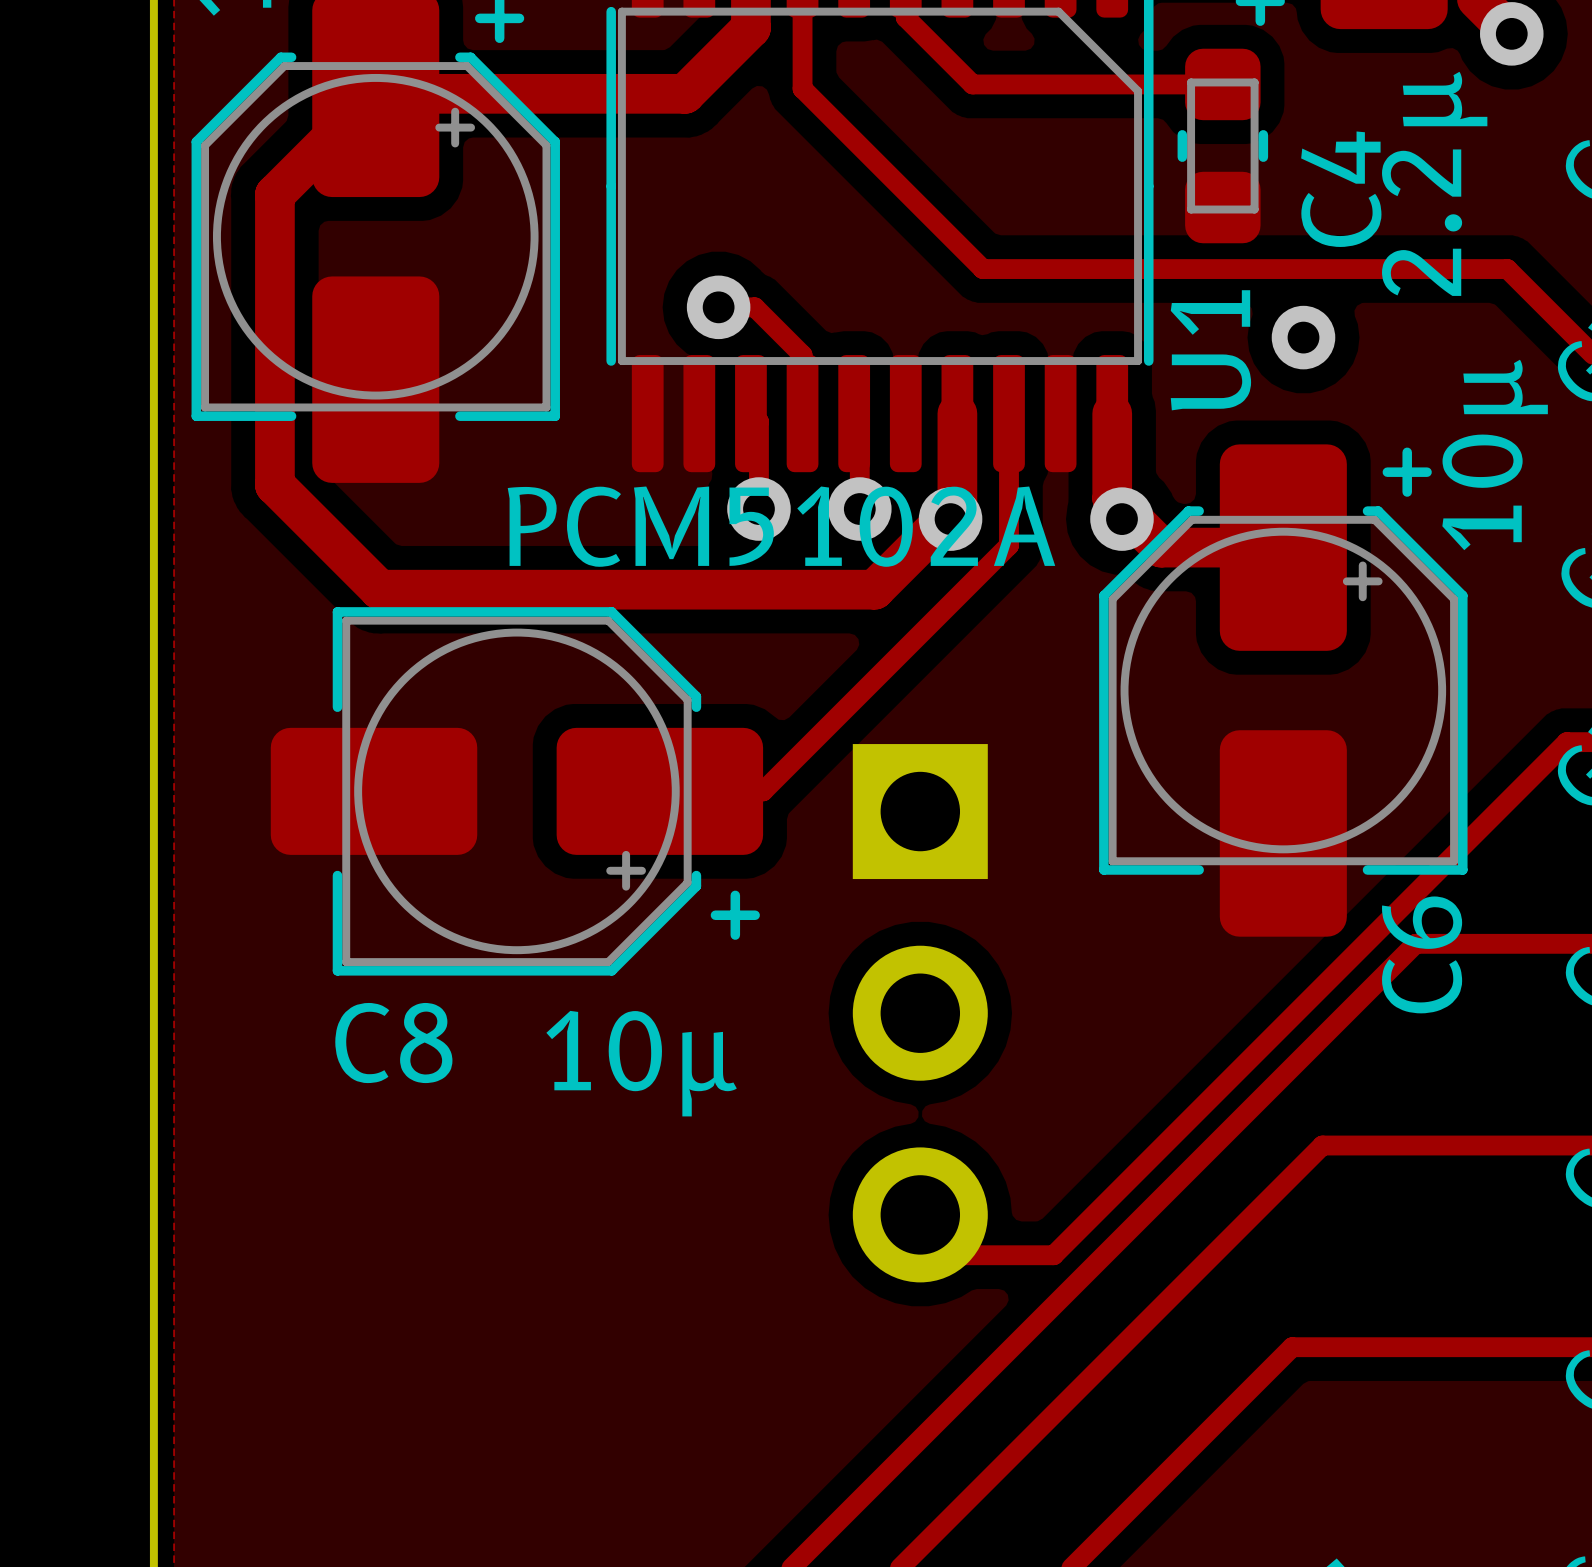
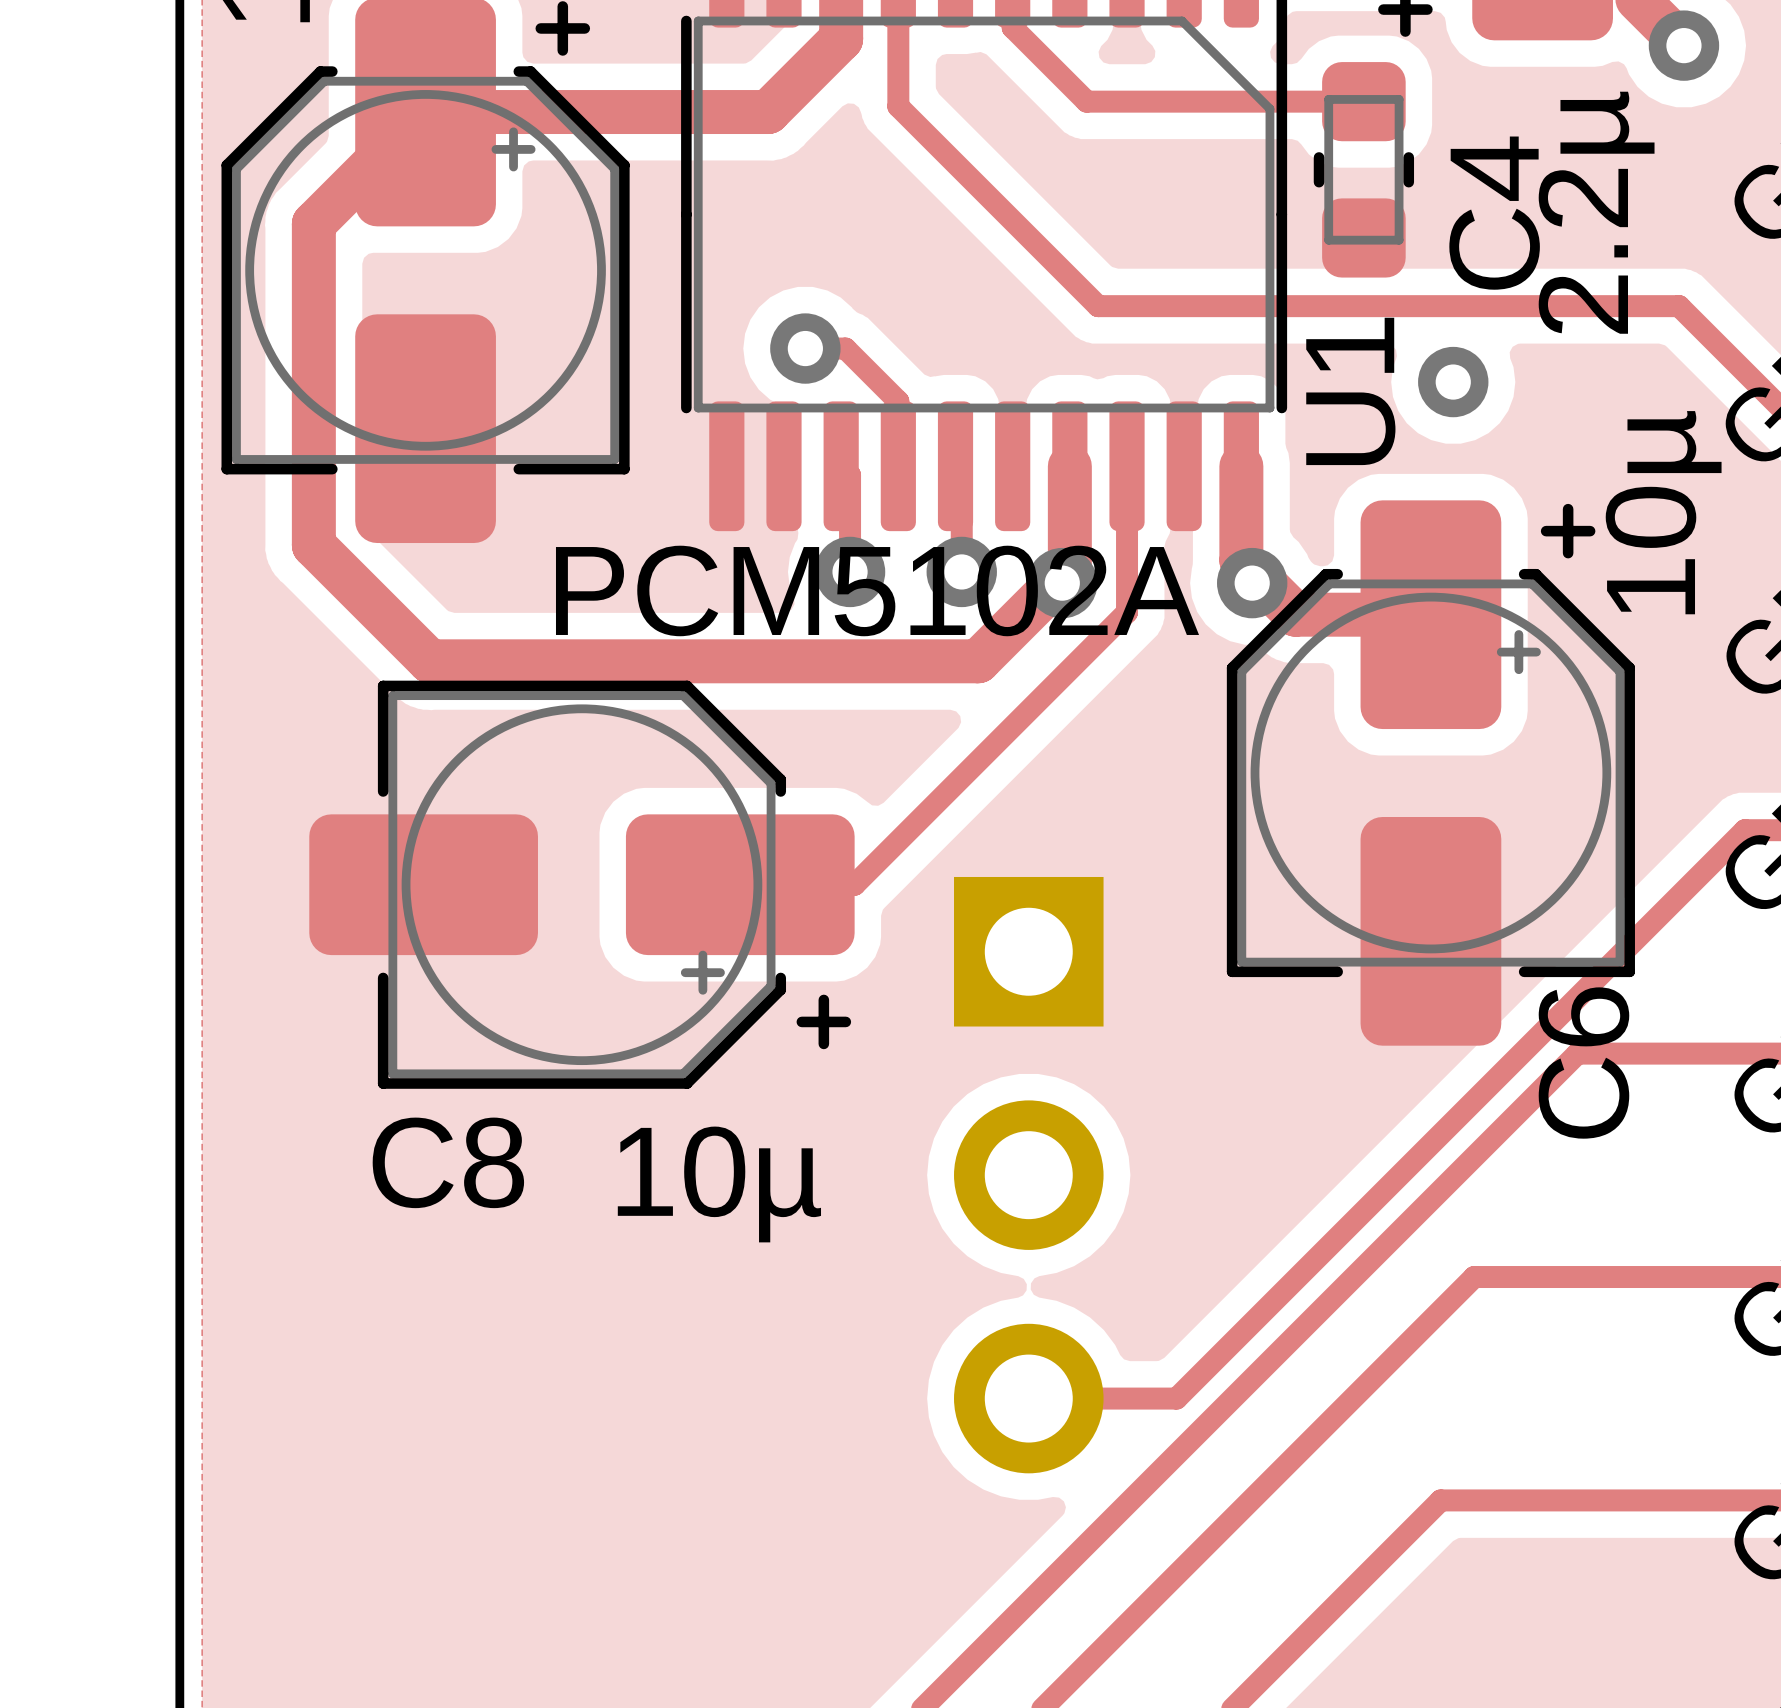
part position: (920, 1013) -> (1028, 1175)

